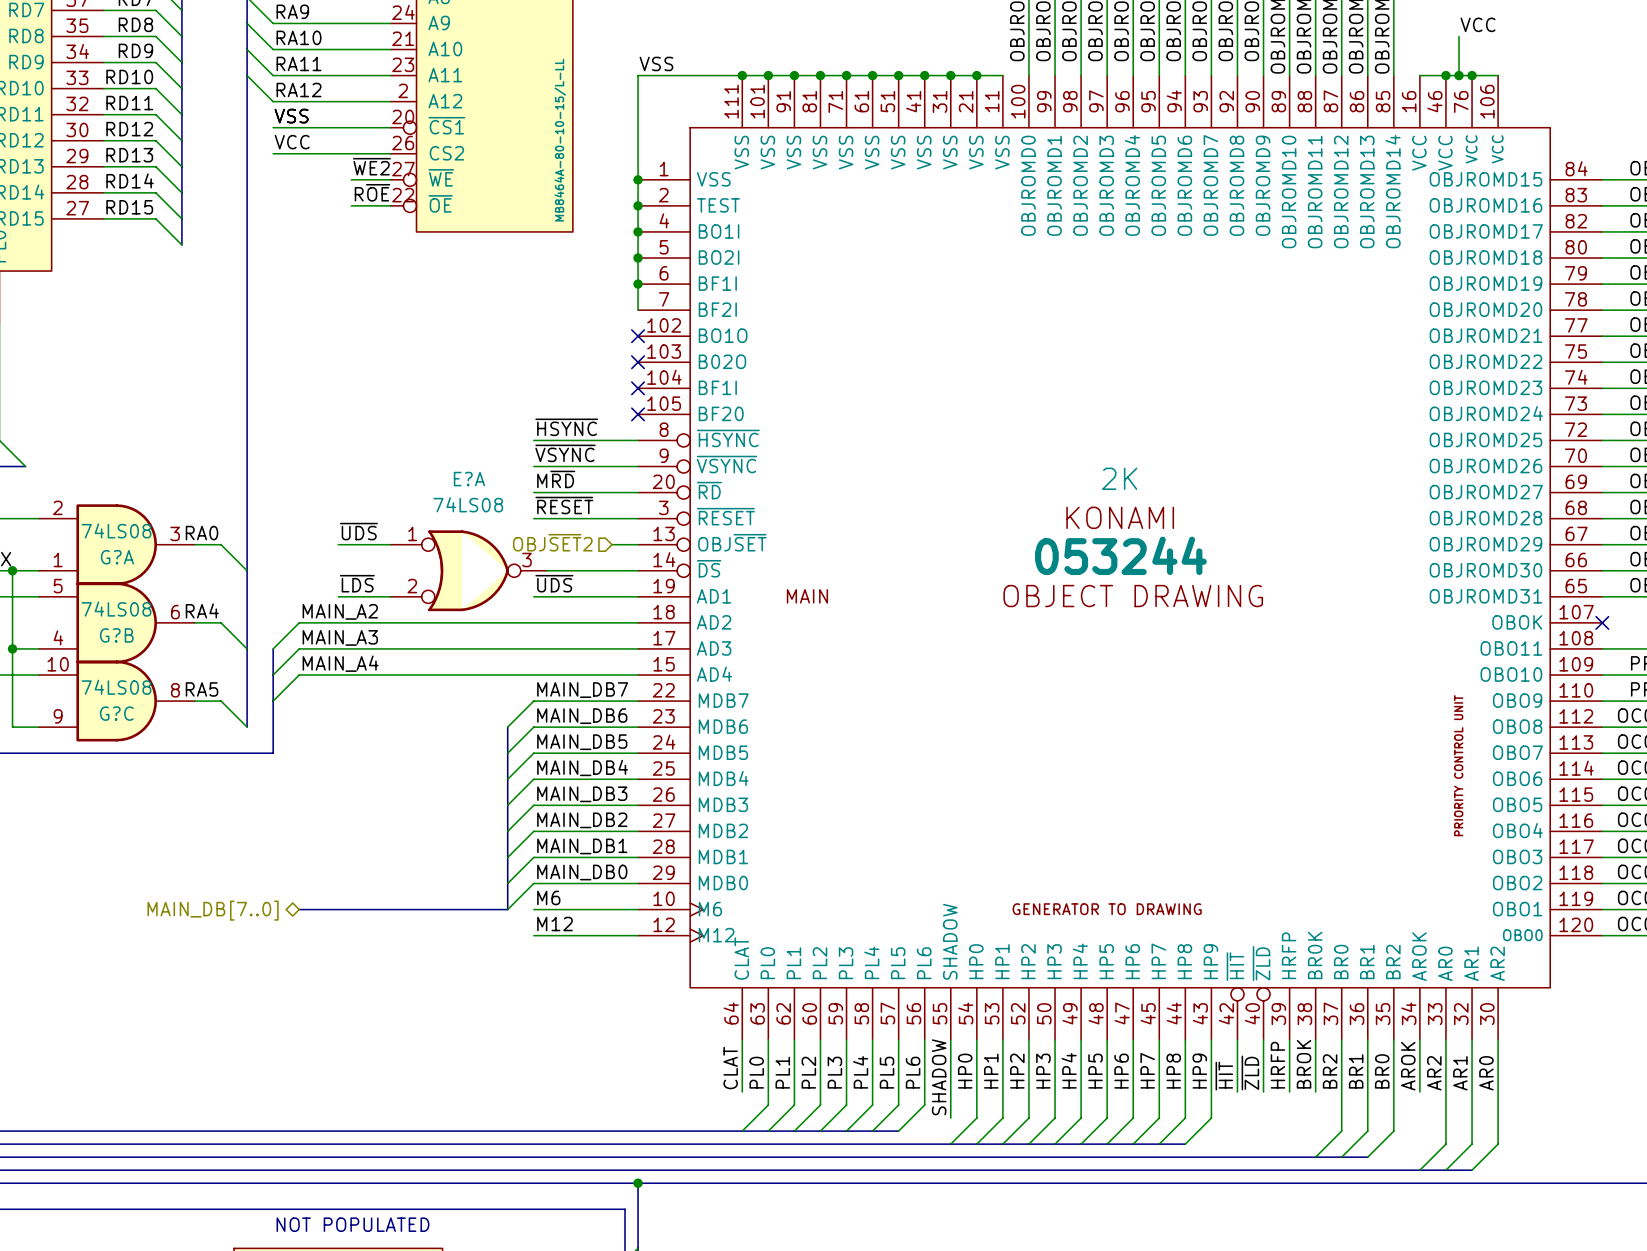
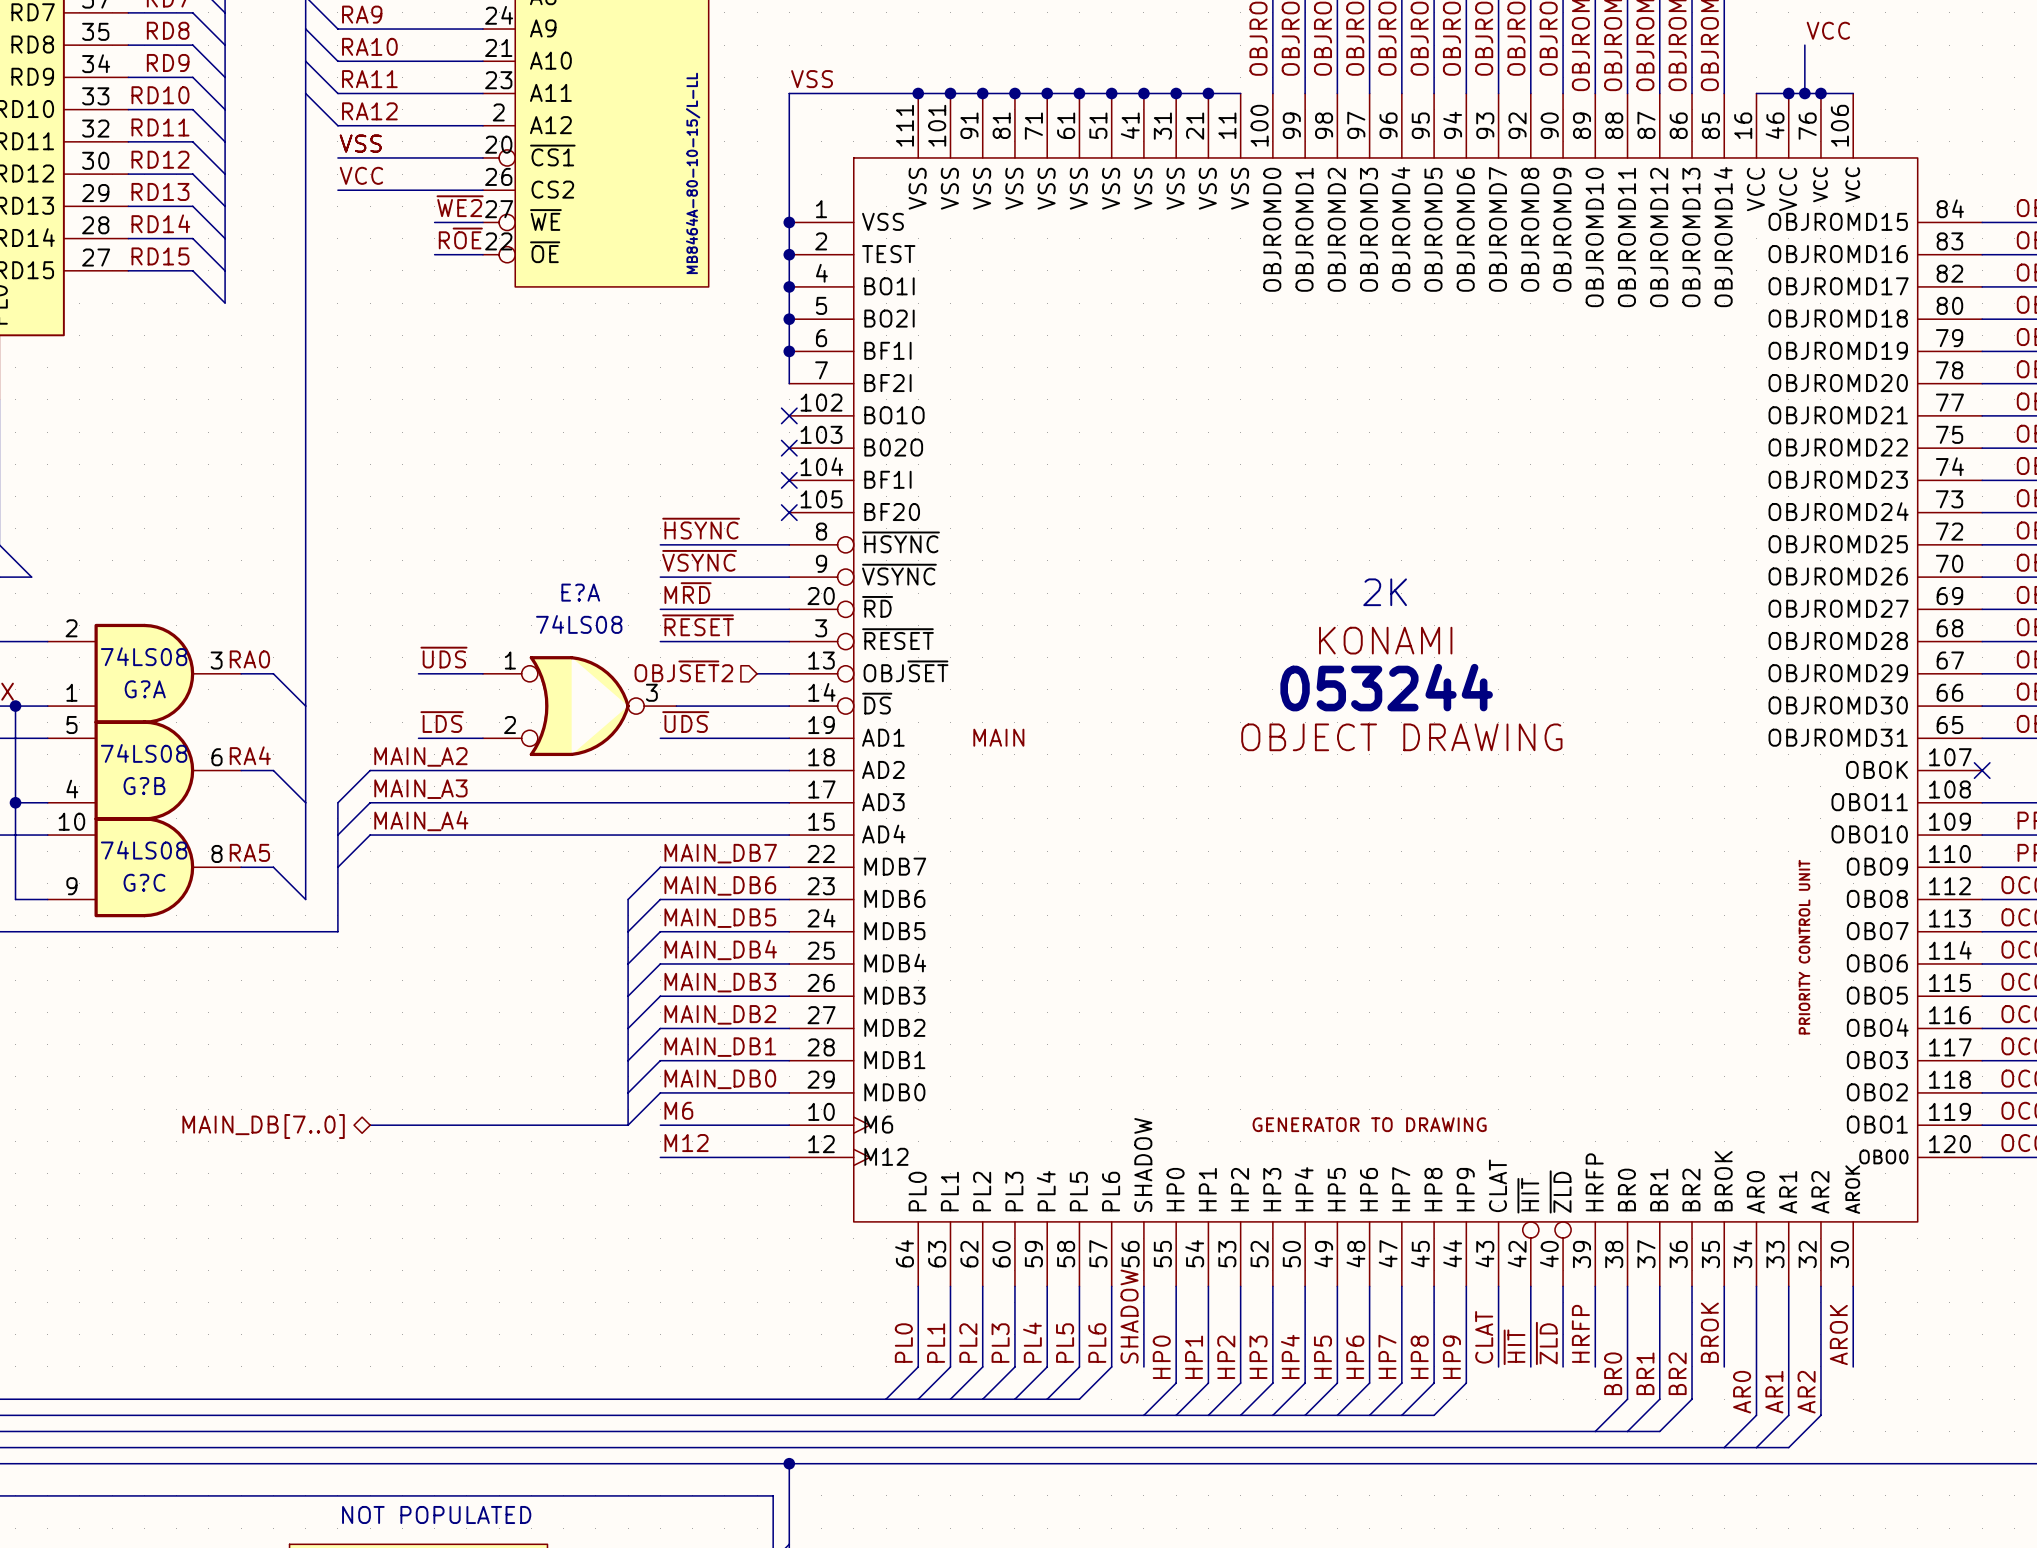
2K symbol: [638, 75, 1603, 1040] -> [789, 93, 1983, 1287]
label: none -> SHADOW (1129, 1316)
label position: BROK (1304, 1064) -> BROK (1709, 1332)
label position: HRFP (1277, 1065) -> HRFP (1580, 1333)
label position: AROK (1408, 1066) -> AROK (1838, 1335)
label: CLAT (730, 1068) -> none
label position: HP4 (1069, 1070) -> HP4 (1290, 1356)
label position: HP7 (1147, 1070) -> HP7 (1387, 1356)
label: HP0 (965, 1071) -> none
label position: HP1 (991, 1071) -> HP1 (1194, 1357)
label position: HP2 (1017, 1071) -> HP2 (1226, 1357)
label position: HP3 (1043, 1071) -> HP3 (1258, 1357)
label position: HP5 (1095, 1071) -> HP5 (1322, 1357)
label position: HP6 (1121, 1071) -> HP6 (1355, 1357)
label position: HP8 (1173, 1071) -> HP8 (1419, 1357)
label position: HP9 (1199, 1071) -> HP9 (1451, 1357)
label position: BR2 (1330, 1071) -> BR2 (1677, 1373)
label position: BR1 (1356, 1071) -> BR1 (1645, 1373)
label position: BR0 (1382, 1071) -> BR0 (1613, 1373)
label position: PL0 (756, 1072) -> PL0 (903, 1343)
label position: PL1 (782, 1072) -> PL1 (936, 1343)
label position: PL2 (808, 1072) -> PL2 (968, 1343)
label position: PL3 (834, 1072) -> PL3 (1000, 1343)
label position: PL4 (860, 1072) -> PL4 (1032, 1342)
label position: PL5 (887, 1072) -> PL5 (1065, 1343)
label position: PL6 (913, 1072) -> PL6 (1097, 1343)
label position: ~{ZLD} (1250, 1072) -> ~{ZLD} (1546, 1343)
label position: AR2 (1434, 1073) -> AR2 (1806, 1392)
label position: AR1 (1460, 1073) -> AR1 (1774, 1392)
label position: AR0 (1486, 1073) -> AR0 (1742, 1392)
label position: ~{HIT} (1224, 1076) -> ~{HIT} (1514, 1347)
label: SHADOW (939, 1077) -> HP0 (1161, 1357)
label: none -> CLAT (1484, 1337)
wire: none -> (918, 1350) (918, 1366) (886, 1399)
wire: none -> (1530, 1350) (1530, 1366)
wire: none -> (1563, 1350) (1563, 1366)
wire: none -> (1595, 1350) (1595, 1366)
wire: none -> (1756, 1350) (1756, 1415) (1724, 1447)
wire: (924, 1105) (898, 1131) -> (1176, 1383) (1143, 1415)
wire: (1211, 1105) (1211, 1118) (1185, 1144) -> none
wire: (1393, 1105) (1393, 1131) (1367, 1157) -> none
wire: (1498, 1105) (1498, 1144) (1472, 1170) -> (1627, 1350) (1627, 1399) (1595, 1431)
bus: (872, 1131) (898, 1131) -> none
bus: (1159, 1144) (1185, 1144) -> none
bus: (1341, 1157) (1367, 1157) -> none
bus: (1445, 1170) (1472, 1170) -> none

